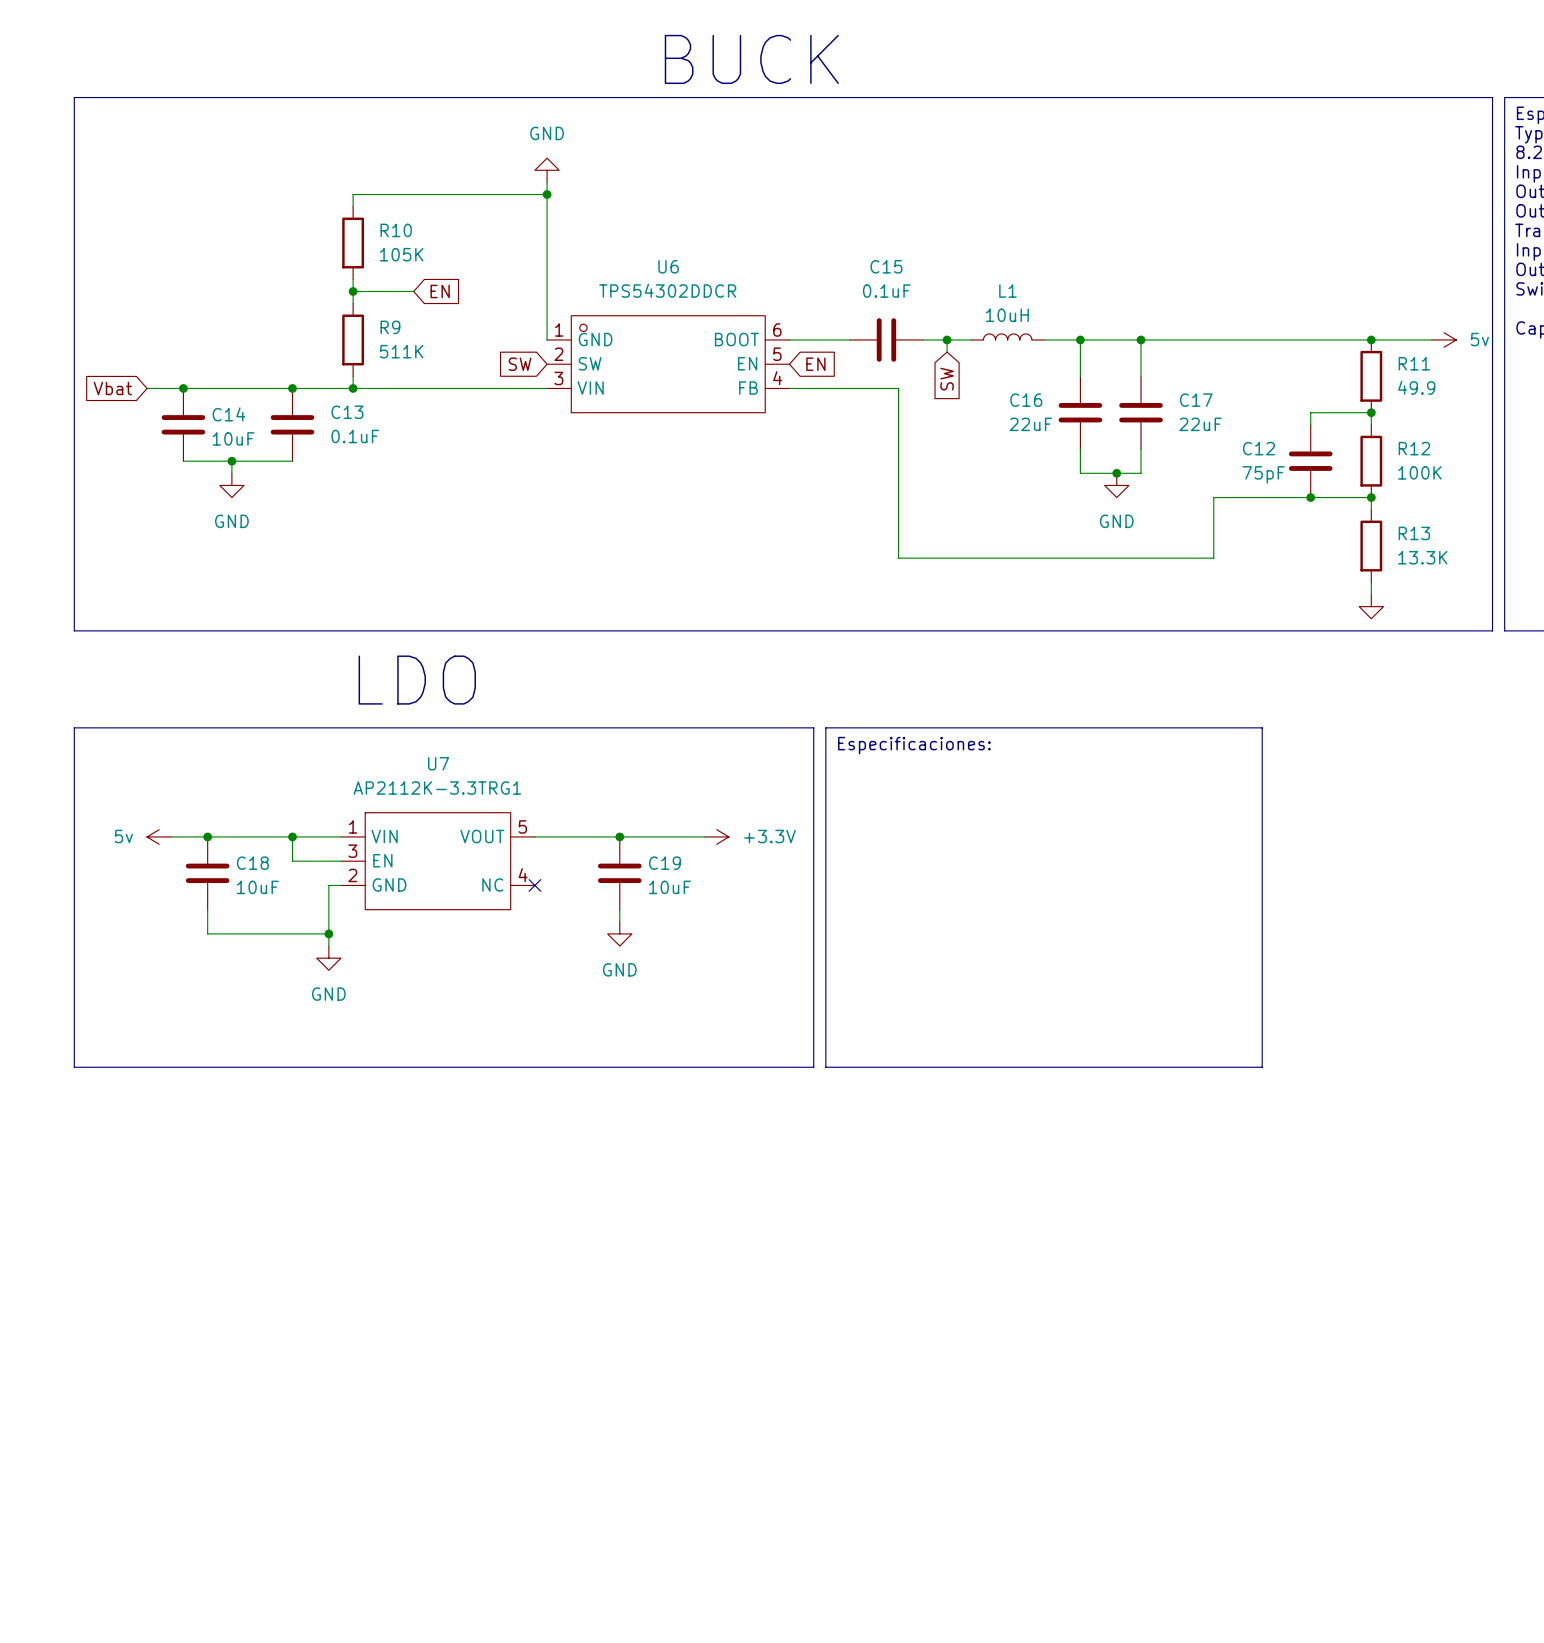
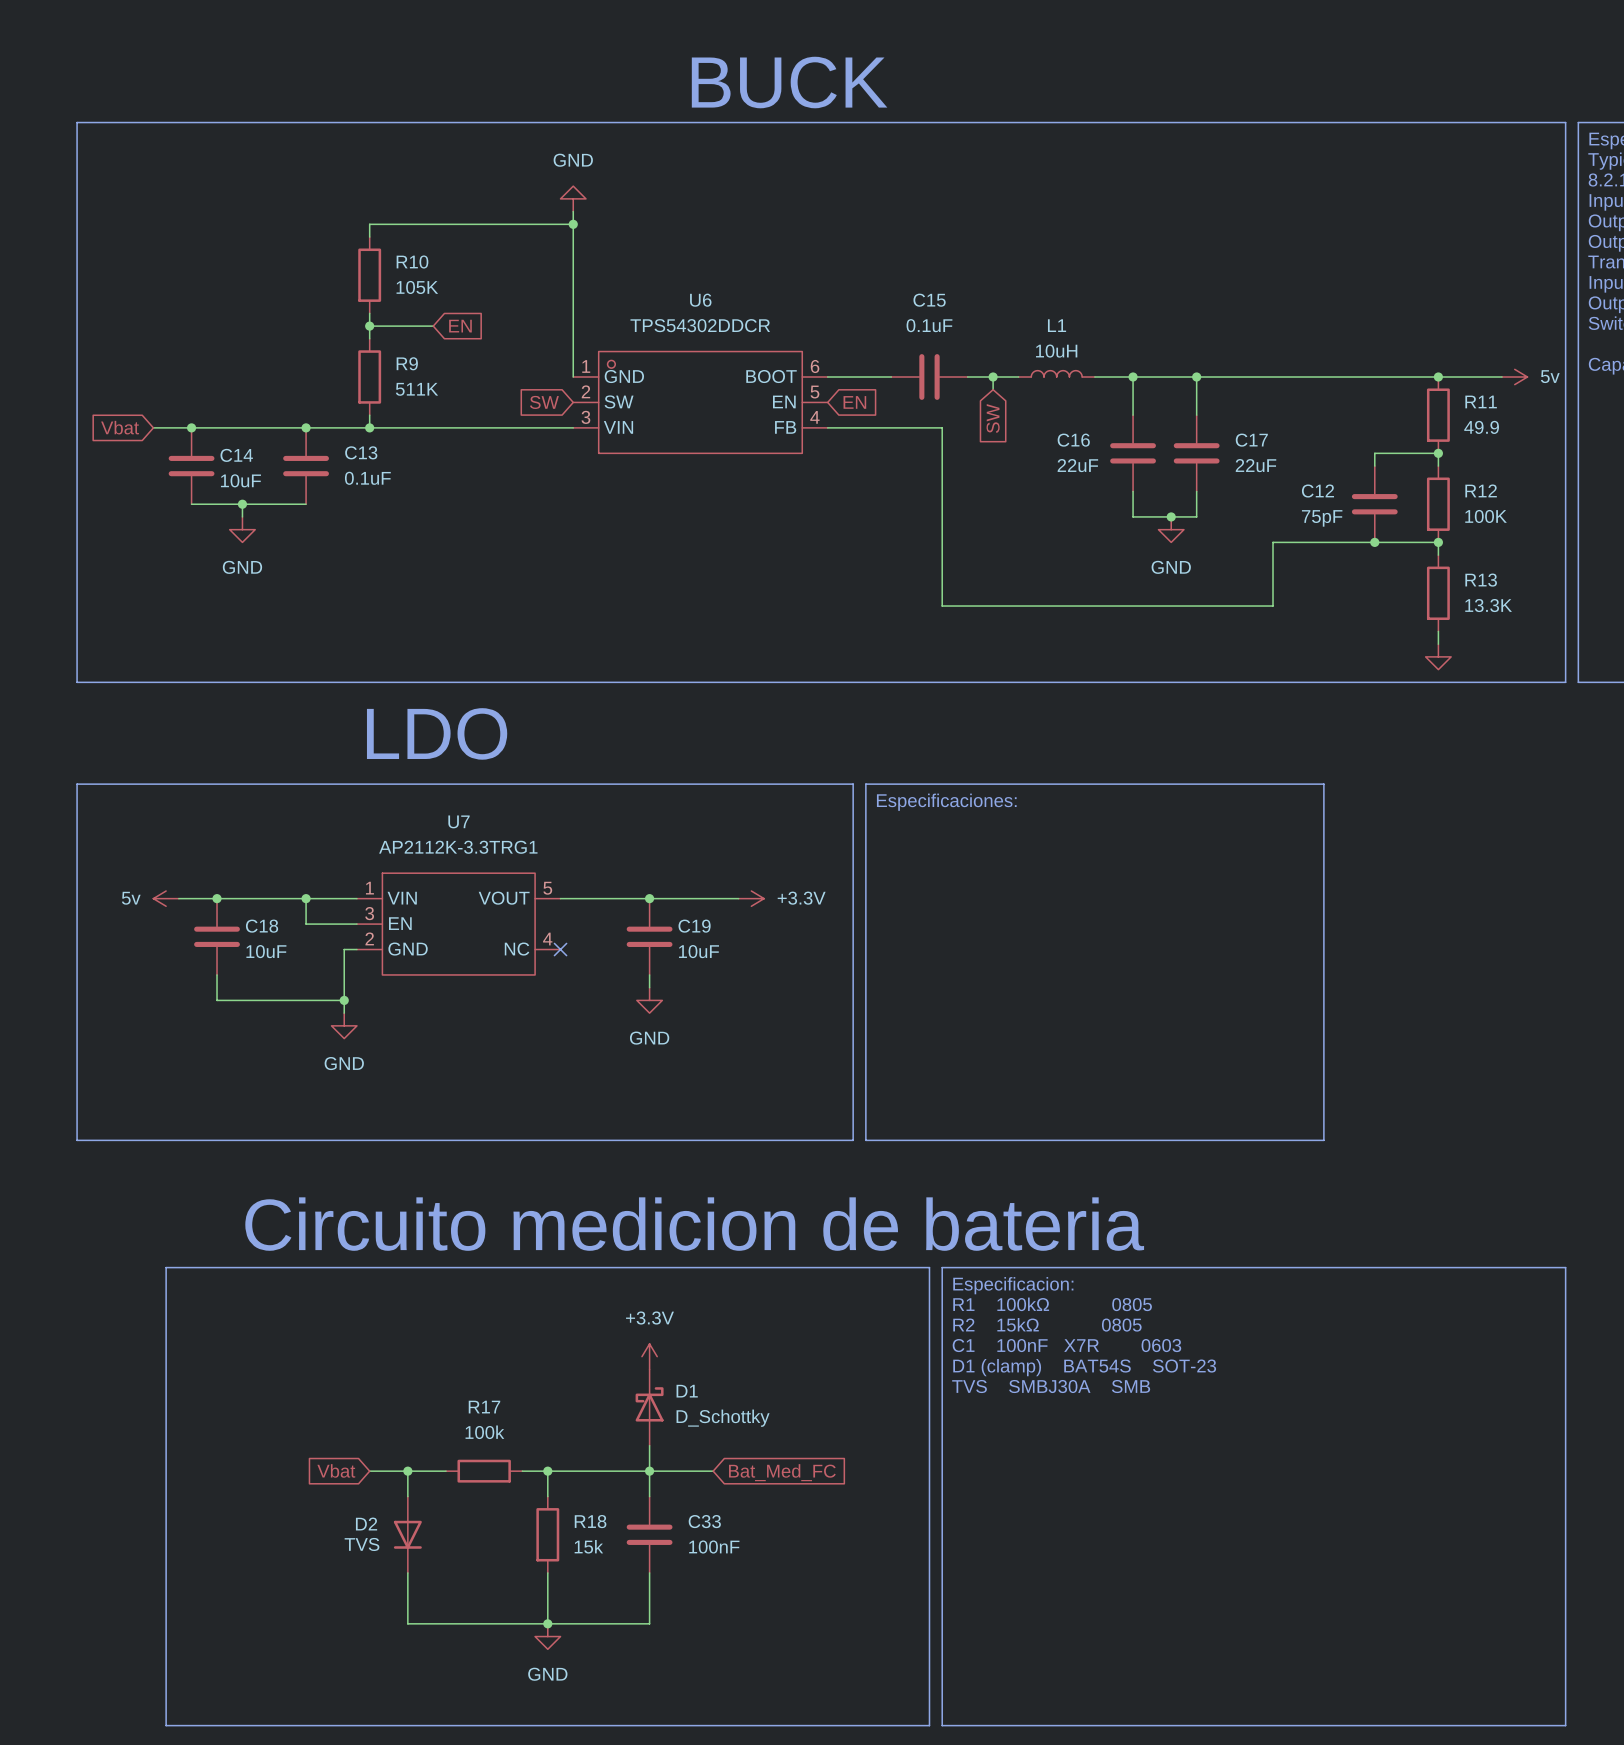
text: none -> Circuito medicion de bateria (694, 1224)
line: none -> (166, 1267) (929, 1267) (929, 1725) (166, 1725) (166, 1267)
line: none -> (942, 1267) (1565, 1267) (1565, 1725) (942, 1725) (942, 1267)
text: none -> Especificacion: (1013, 1285)
text: none -> R1 100kΩ 0805 (1052, 1304)
text: none -> R2 15kΩ 0805 (1047, 1324)
text: none -> C1 100nF X7R 0603 (1066, 1345)
power symbol: none -> +3.3V (649, 1356)
text: none -> D1 (clamp) BAT54S SOT-23 (1084, 1367)
text: none -> TVS SMBJ30A SMB (1051, 1386)
D1: none -> D_Schottky (649, 1407)
wire: none -> (649, 1445) (649, 1496)
global label: none -> Vbat (336, 1470)
wire: none -> (369, 1471) (446, 1471)
wire: none -> (407, 1471) (407, 1496)
junction: none -> (407, 1471)
R17: none -> 100k (484, 1471)
wire: none -> (522, 1471) (713, 1471)
wire: none -> (547, 1471) (547, 1496)
junction: none -> (547, 1471)
junction: none -> (649, 1471)
global label: none -> Bat_Med_FC (782, 1472)
D2: none -> TVS (407, 1534)
R18: none -> 15k (547, 1534)
C33: none -> 100nF (649, 1534)
wire: none -> (407, 1572) (407, 1623) (649, 1623) (649, 1572)
wire: none -> (547, 1572) (547, 1623)
junction: none -> (547, 1623)
power symbol: none -> GND (547, 1636)

